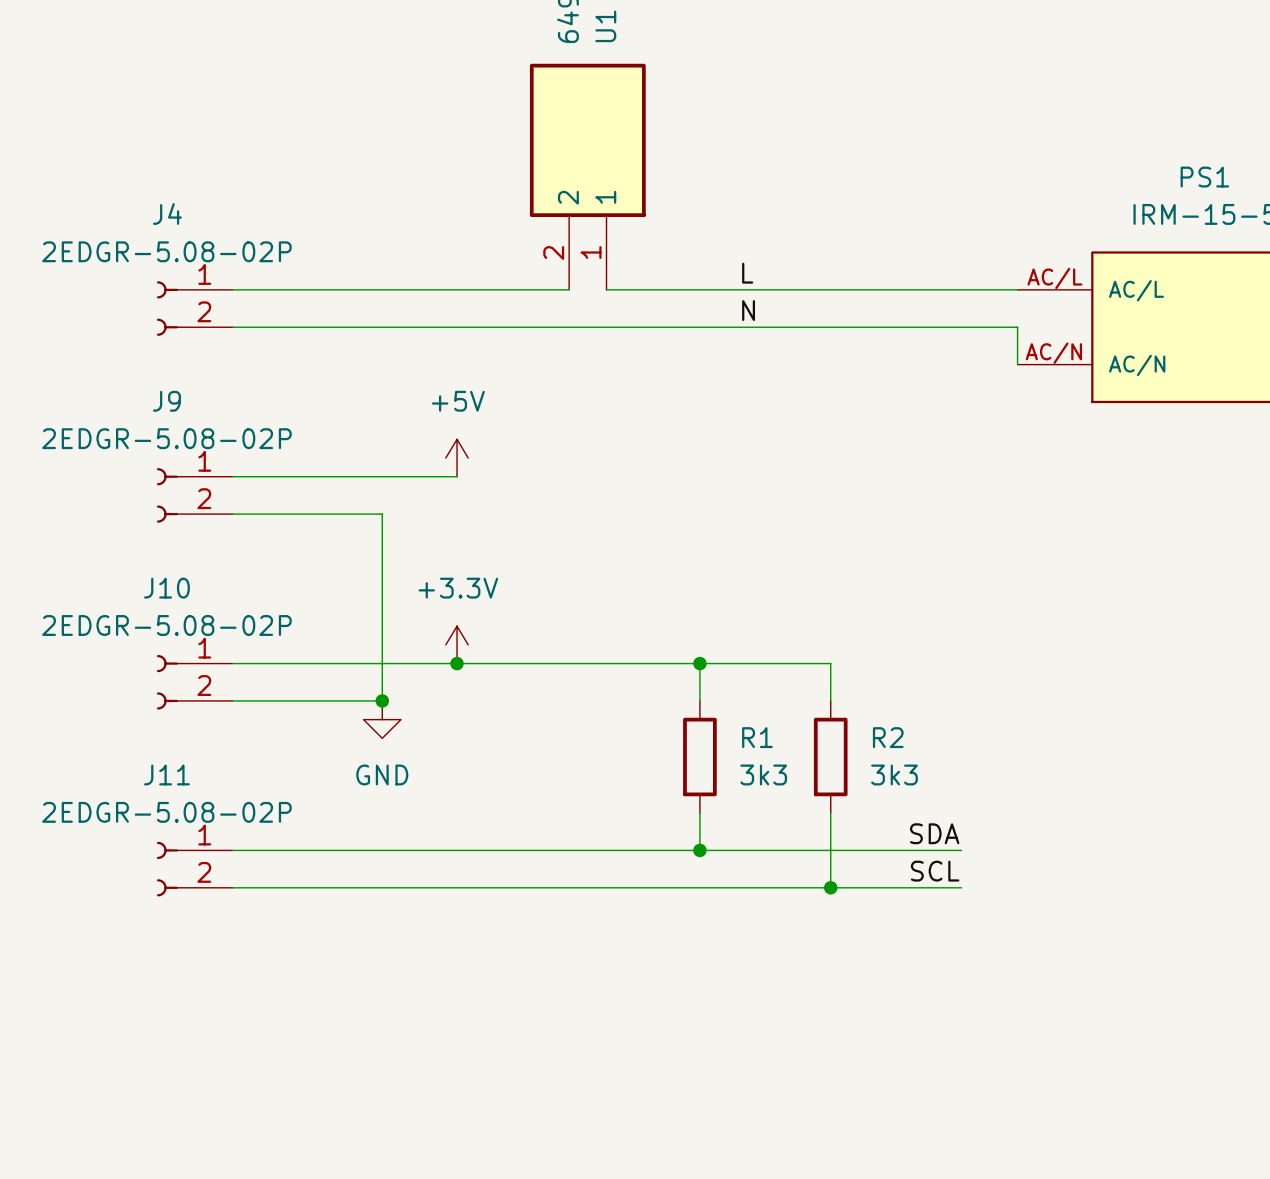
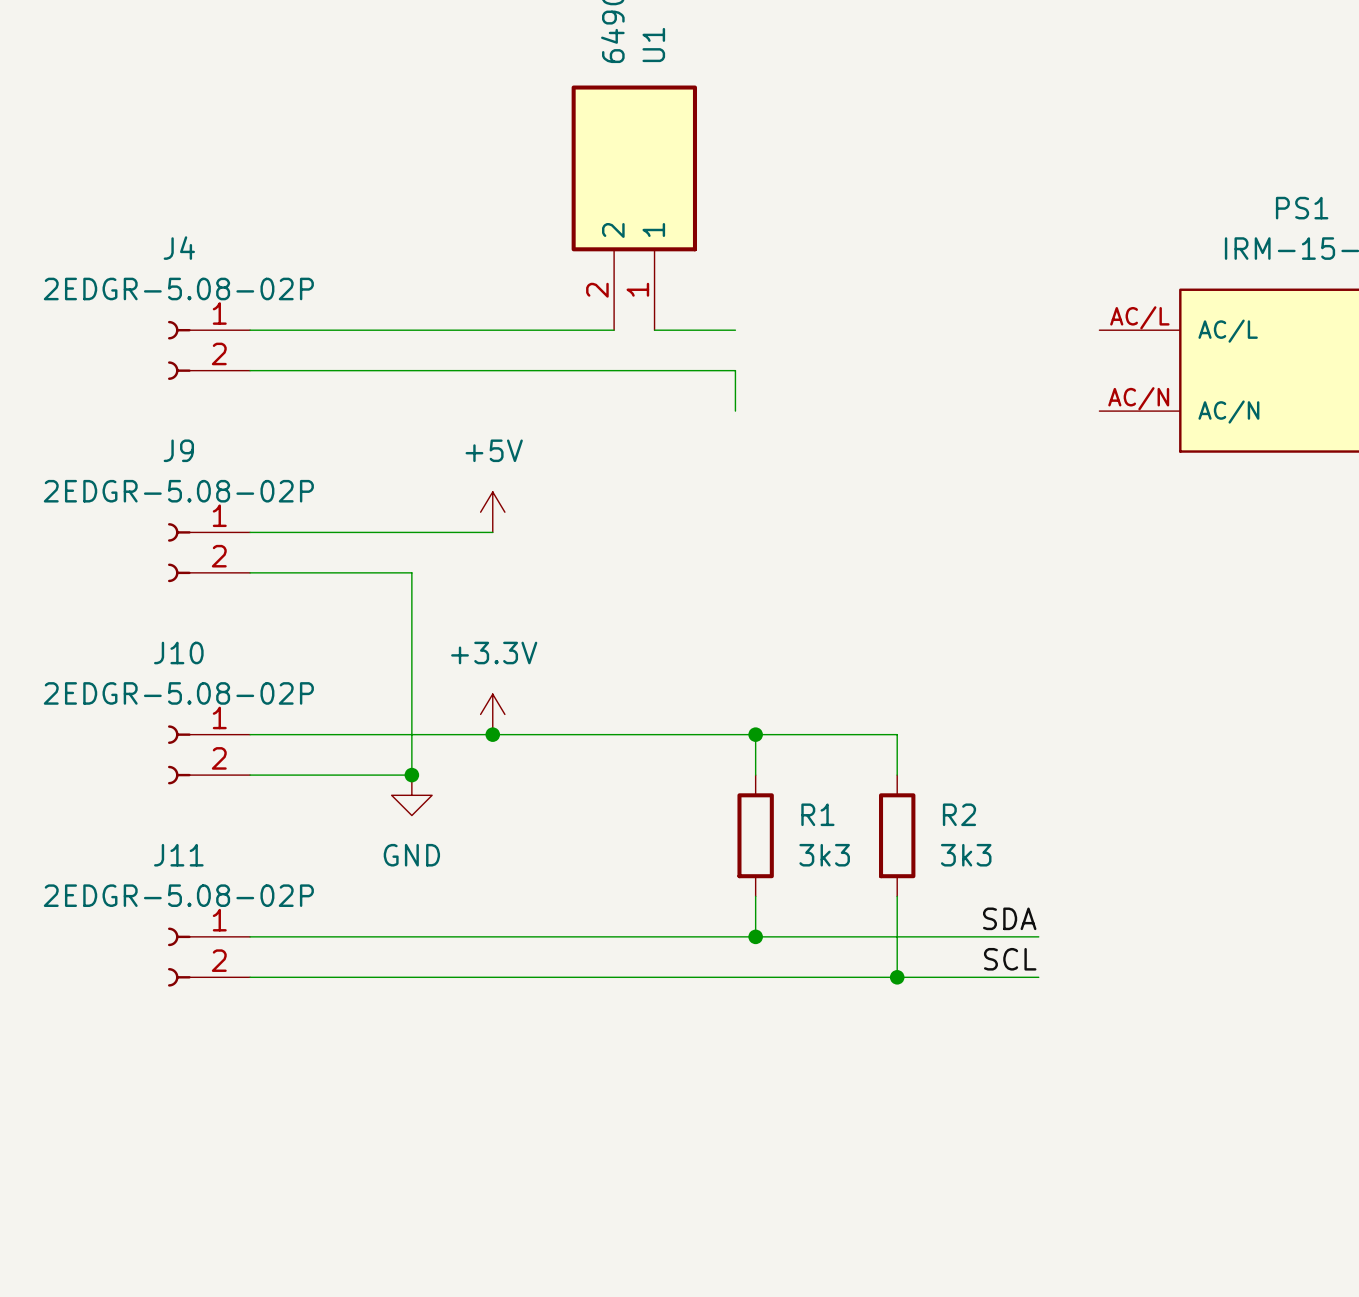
label: L (747, 273) -> none
wire: (681, 289) (1017, 289) -> none
label: N (748, 310) -> none
wire: (681, 327) (1017, 327) (1017, 364) -> (735, 370) (735, 411)

